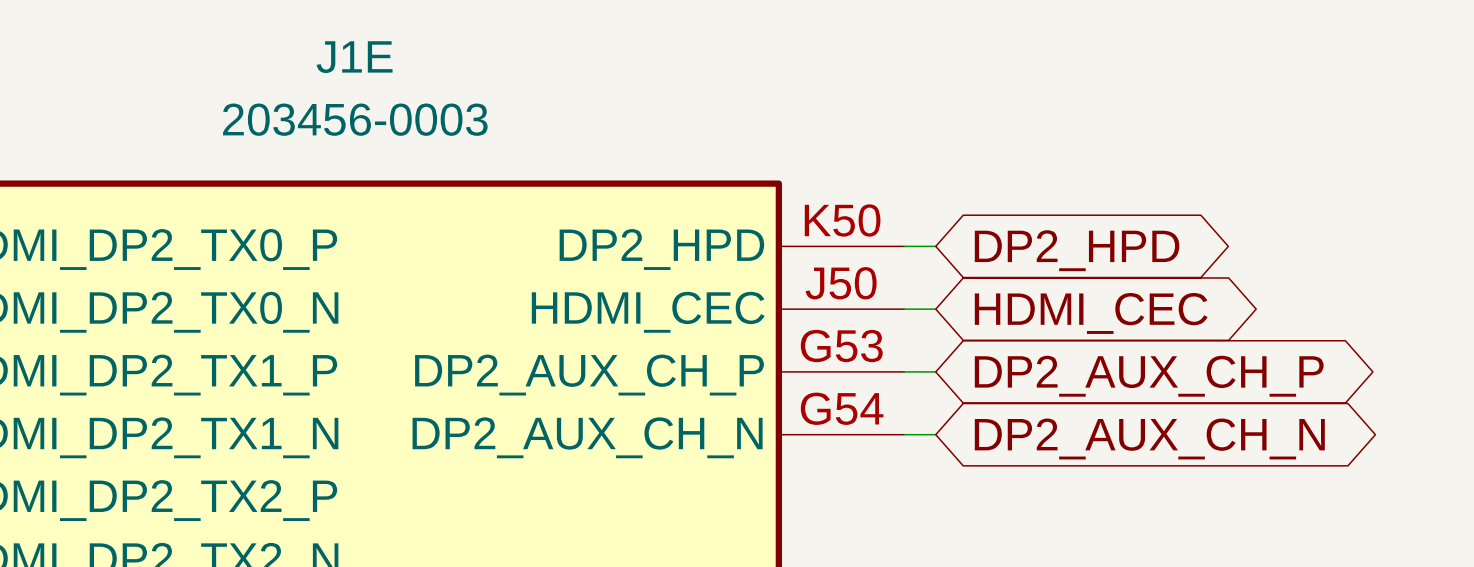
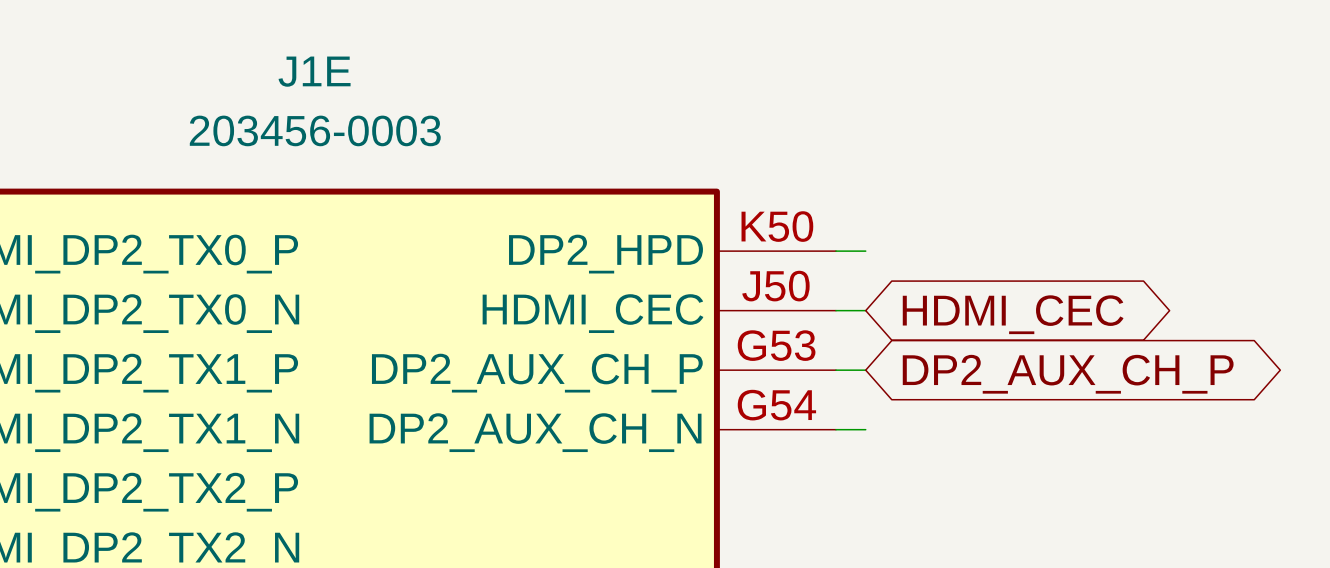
global label: DP2_HPD (1077, 250) -> none
global label: DP2_AUX_CH_N (1149, 438) -> none

